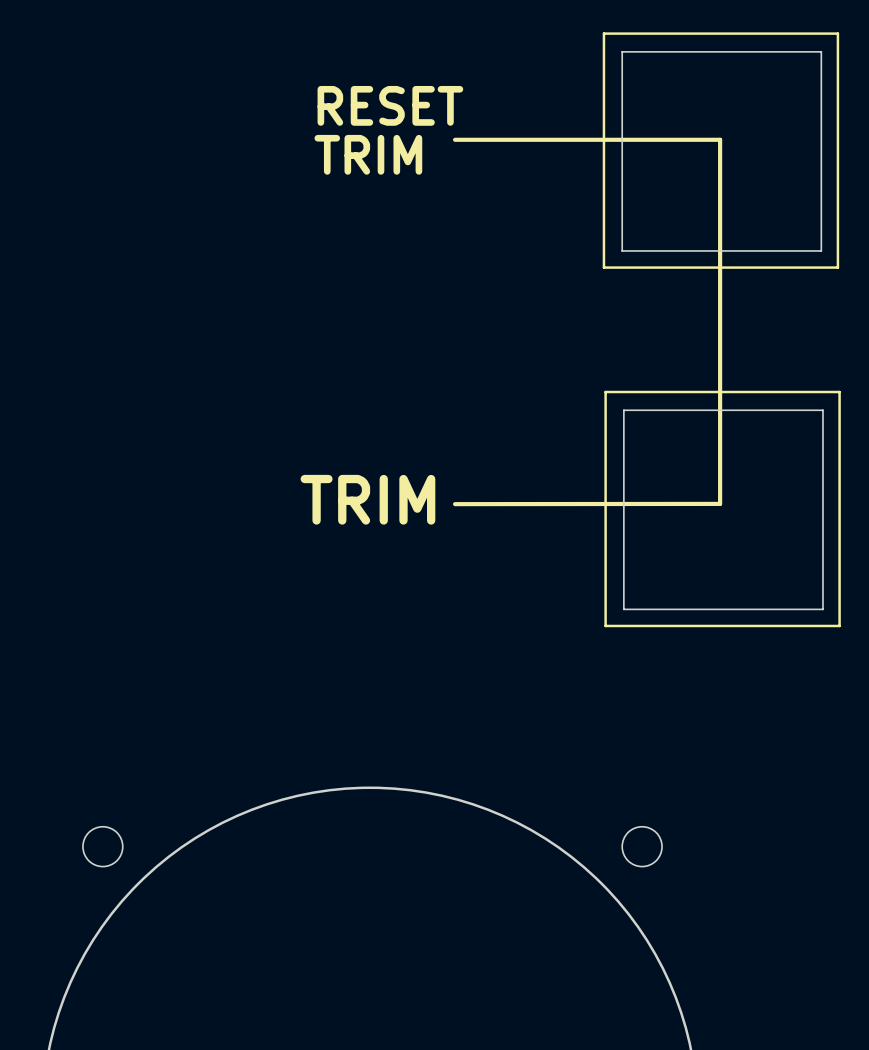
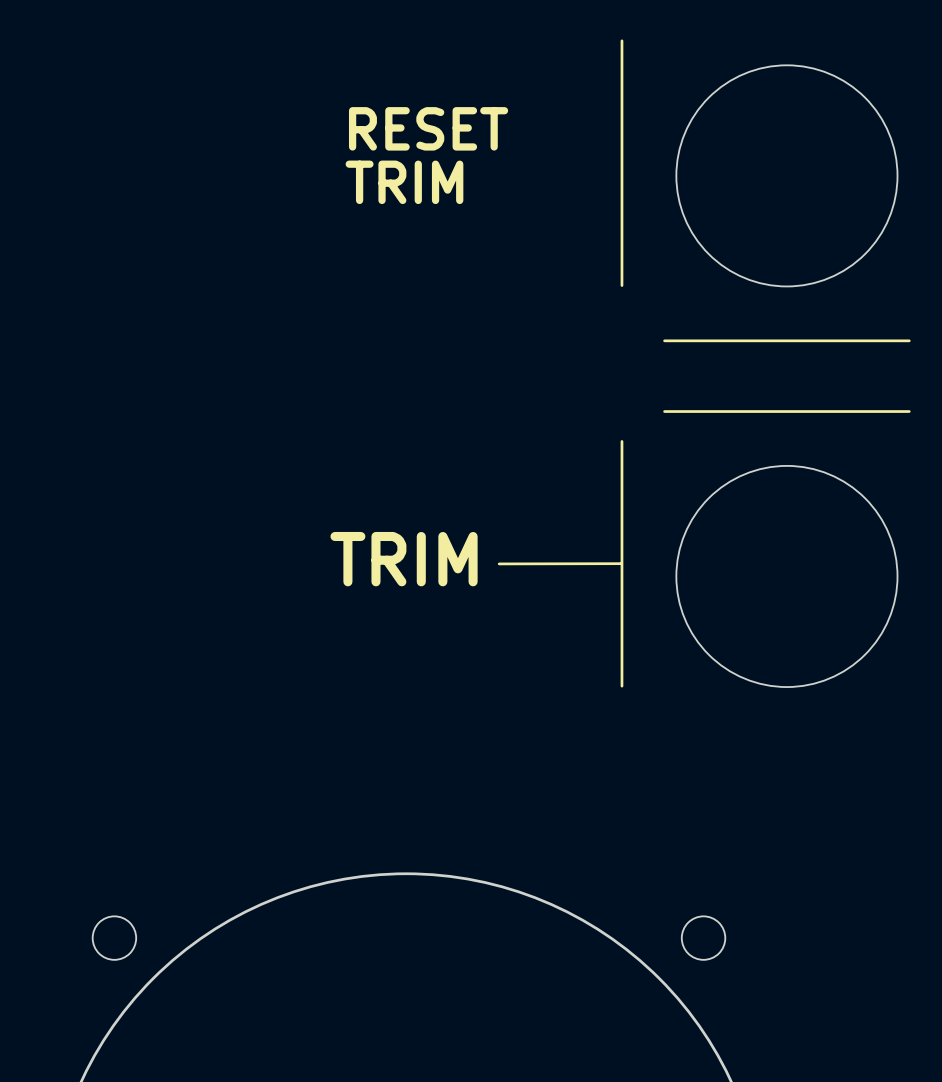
line: none -> (621, 40) (621, 285)
line: (603, 33) (837, 33) (837, 267) (603, 267) (603, 33) -> none
round board edge: none -> [675, 64, 899, 288]
board edge: (622, 51) (821, 51) (821, 250) (622, 250) (622, 51) -> none
line: (455, 139) (720, 139) (720, 503) (455, 504) -> (621, 563) (499, 563)
line: none -> (664, 340) (909, 340)
line: none -> (664, 411) (909, 411)
line: none -> (621, 441) (621, 686)
line: (605, 392) (839, 392) (839, 625) (605, 625) (605, 392) -> none
board edge: (623, 410) (822, 410) (822, 609) (623, 609) (623, 410) -> none
round board edge: none -> [675, 464, 899, 688]

